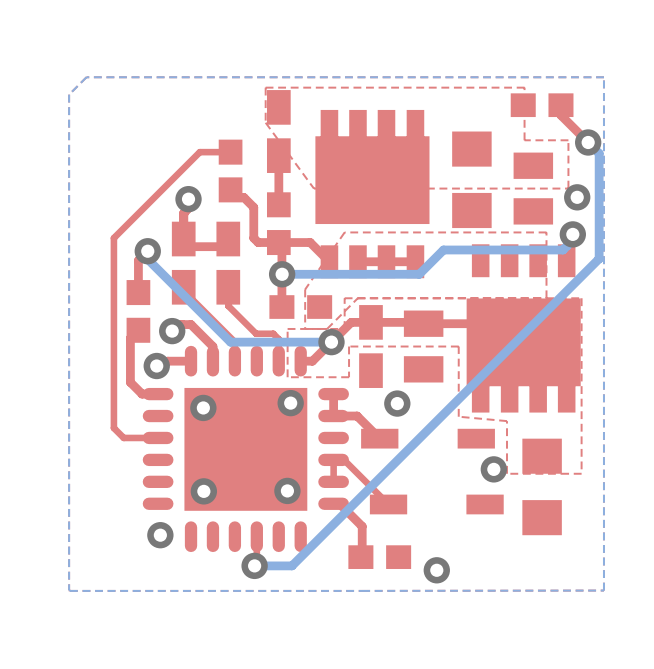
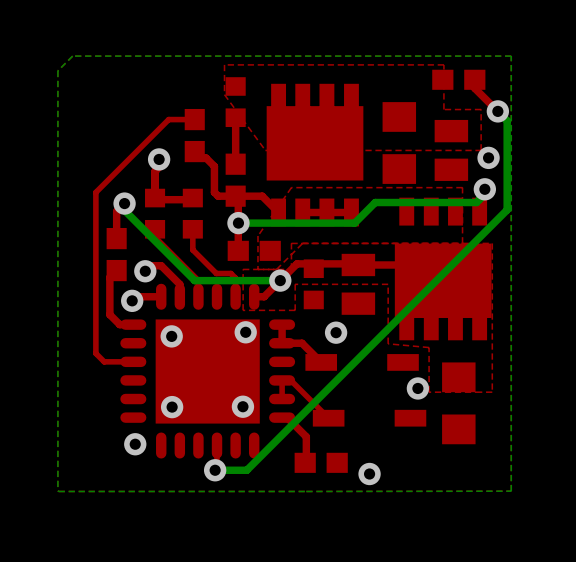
part footprint: [266, 90, 291, 173] -> [225, 77, 246, 128]
part footprint: [171, 221, 196, 305] -> [145, 188, 166, 239]
part footprint: [216, 221, 241, 305] -> [182, 188, 203, 239]
part footprint: [359, 305, 383, 388] -> [303, 259, 324, 310]

